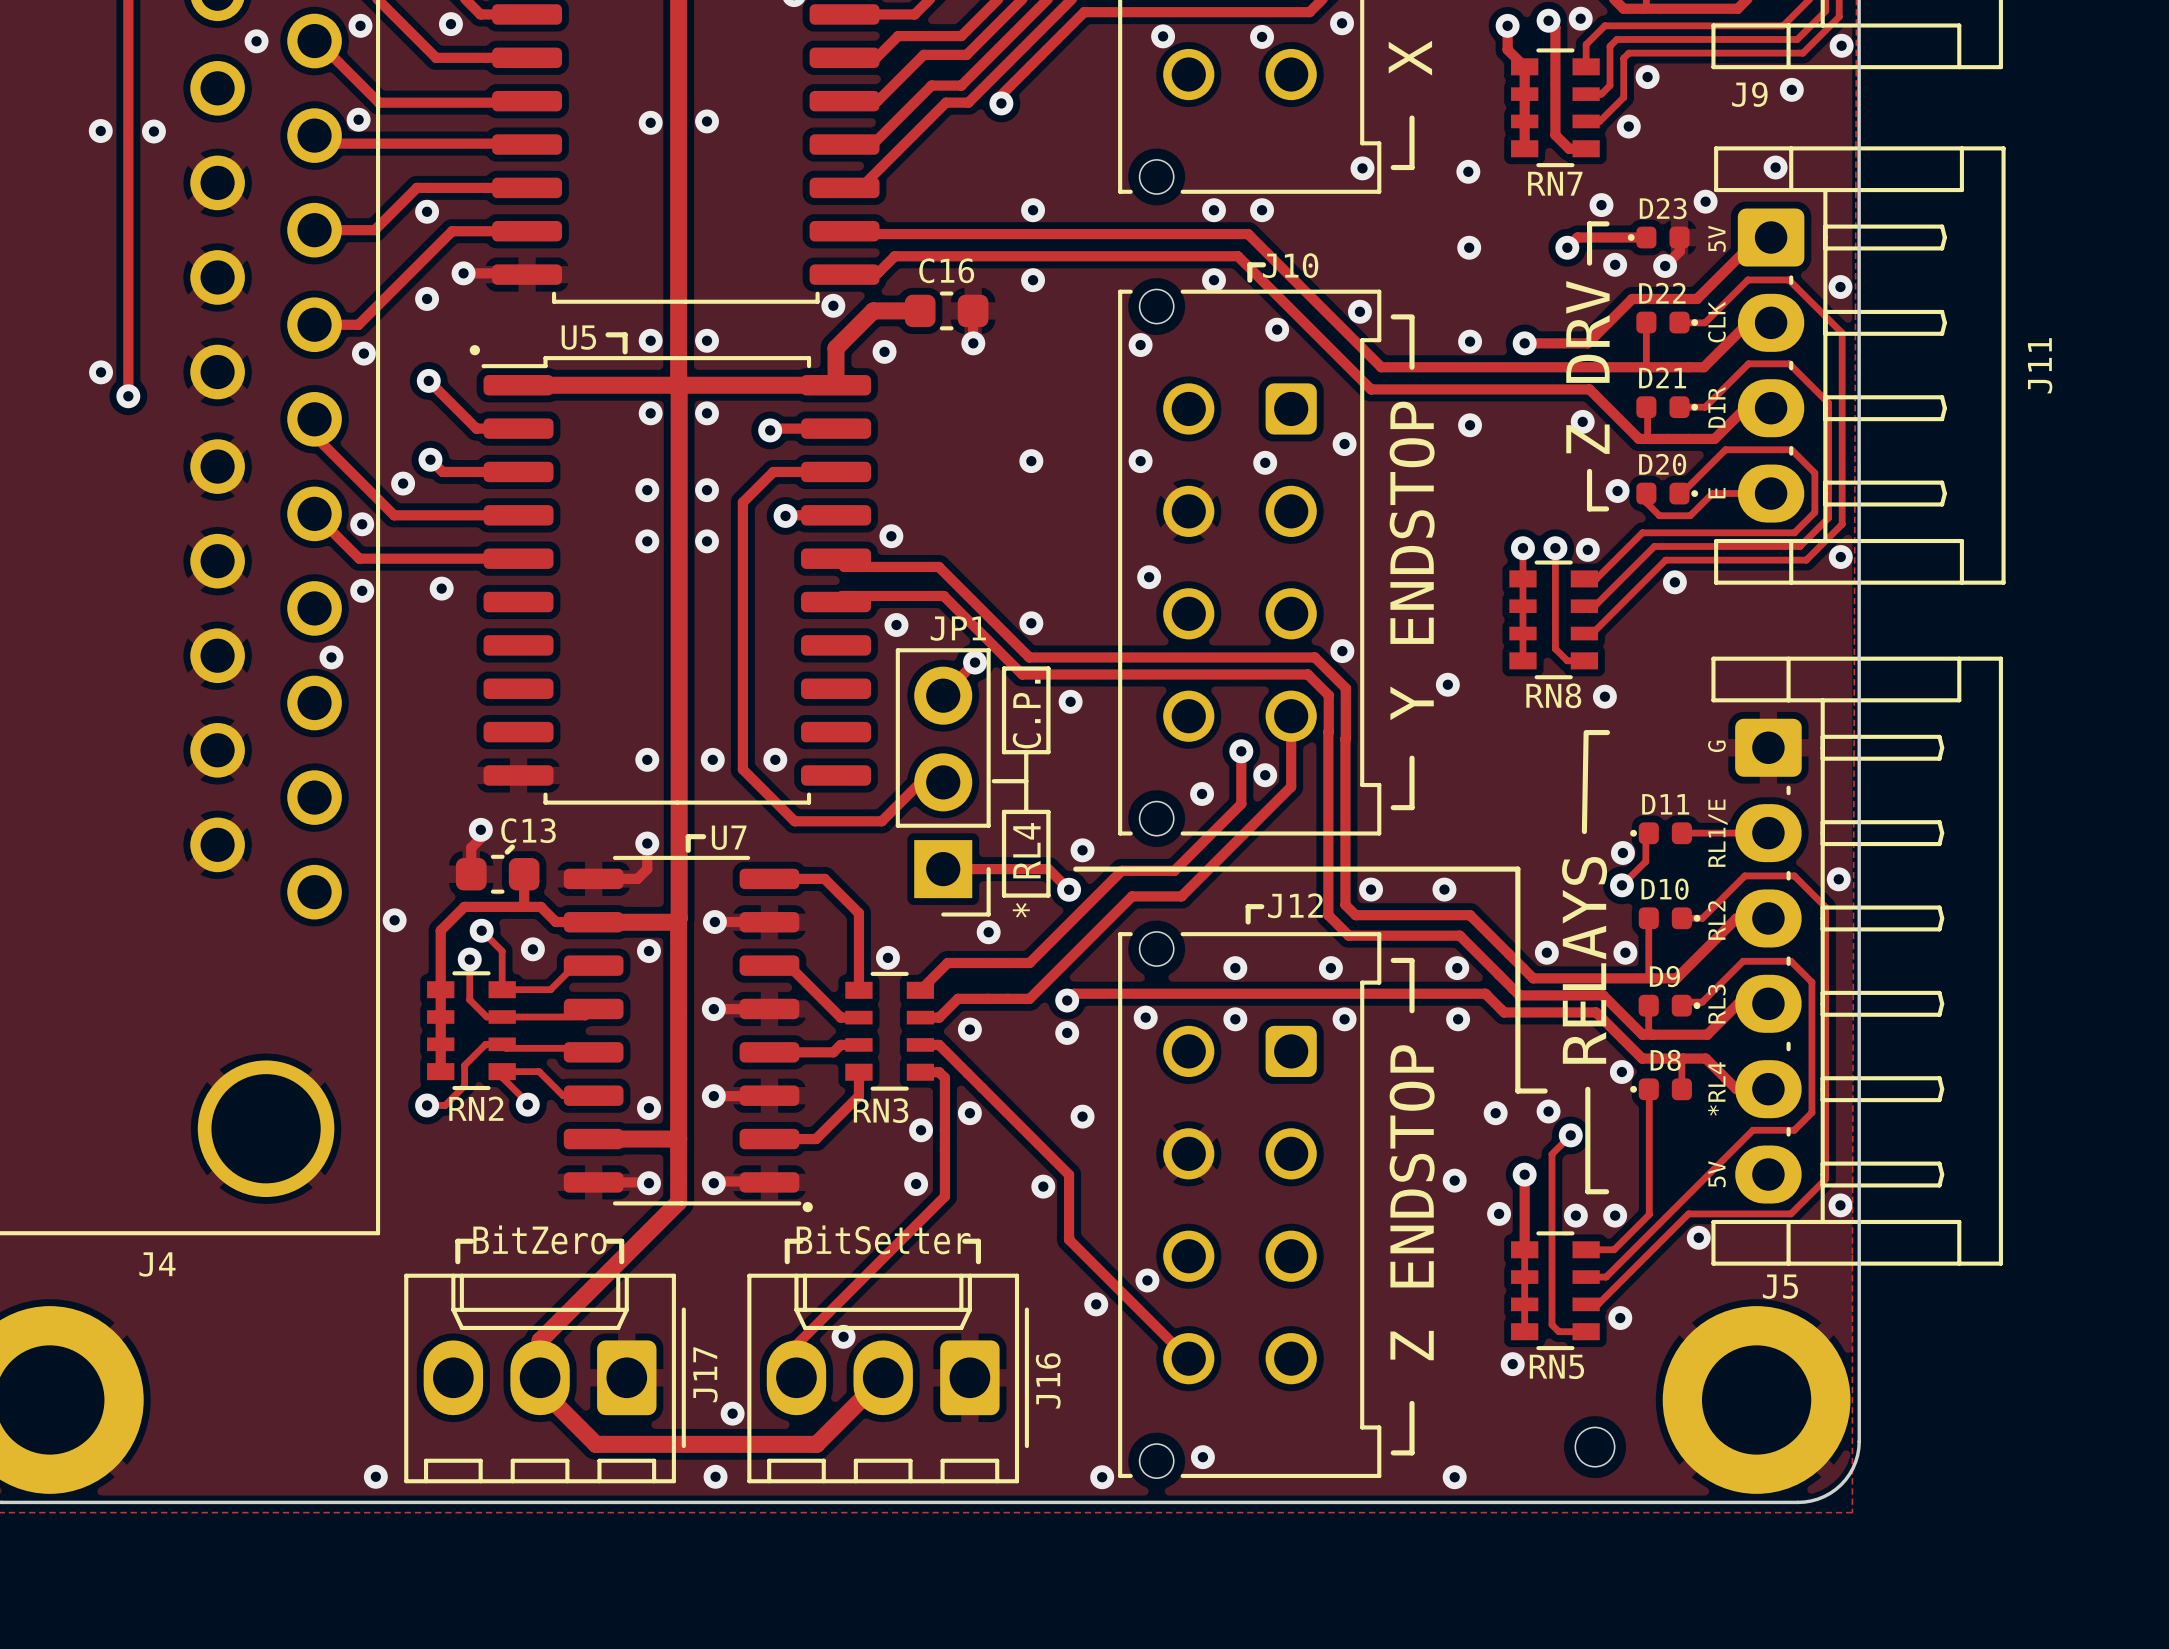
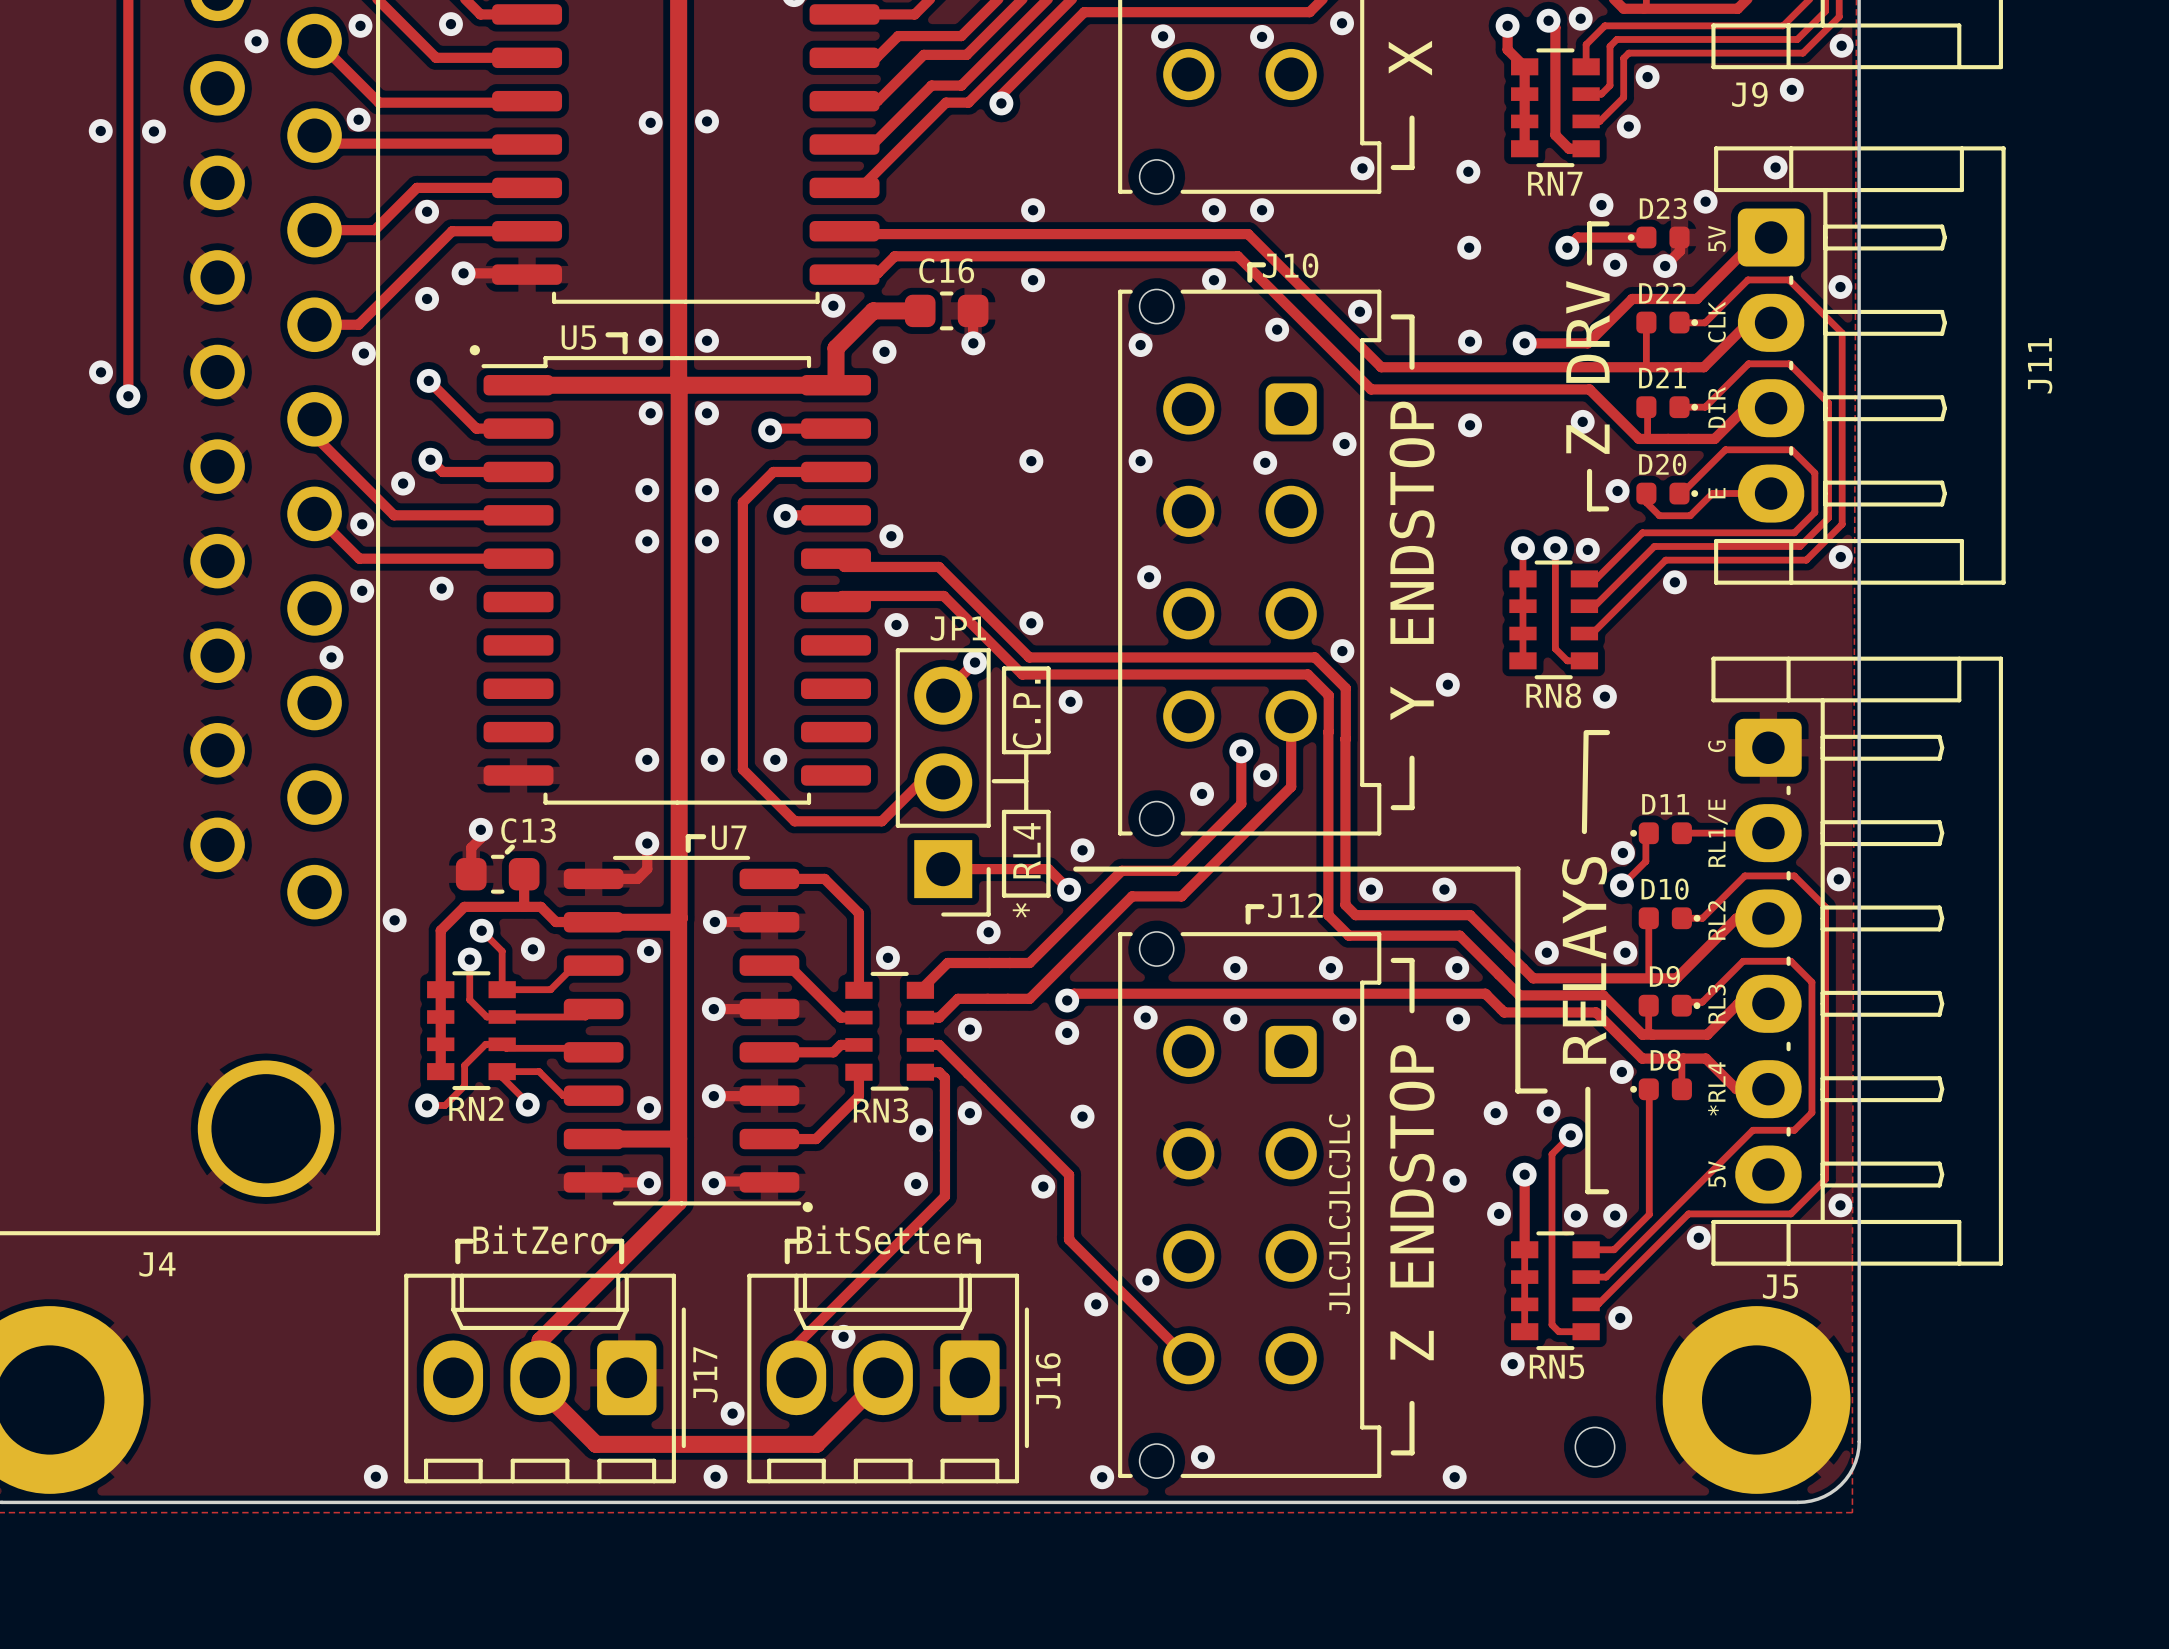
text: none -> JLCJLCJLCJLC (1339, 1214)

